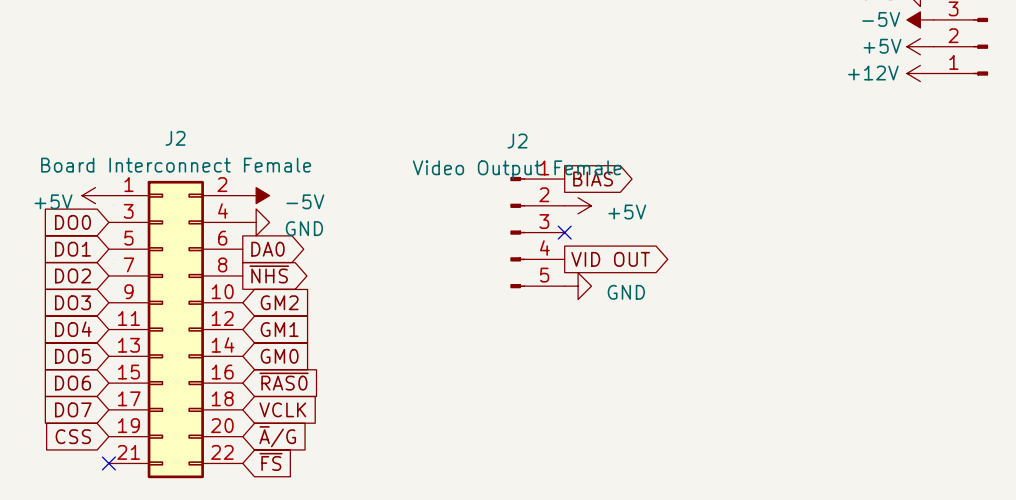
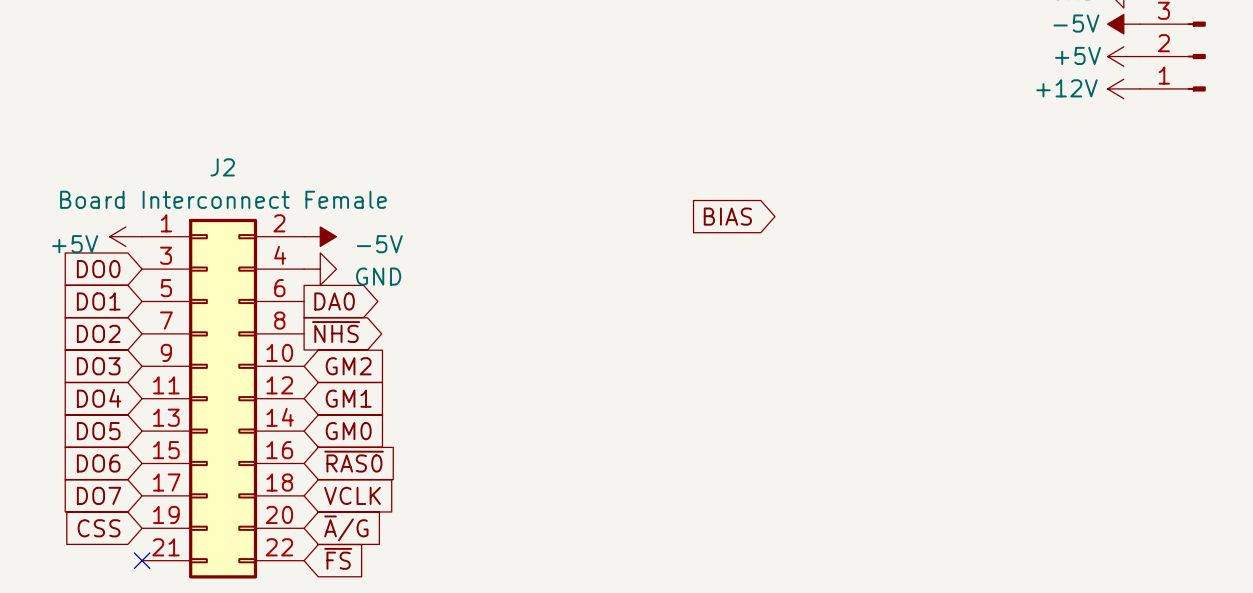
power symbol: +5V (578, 205) -> none
J2: Video Output Female (537, 232) -> none
no-connect mark: (564, 232) -> none
global label: VID OUT (610, 259) -> none
power symbol: GND (578, 286) -> none

